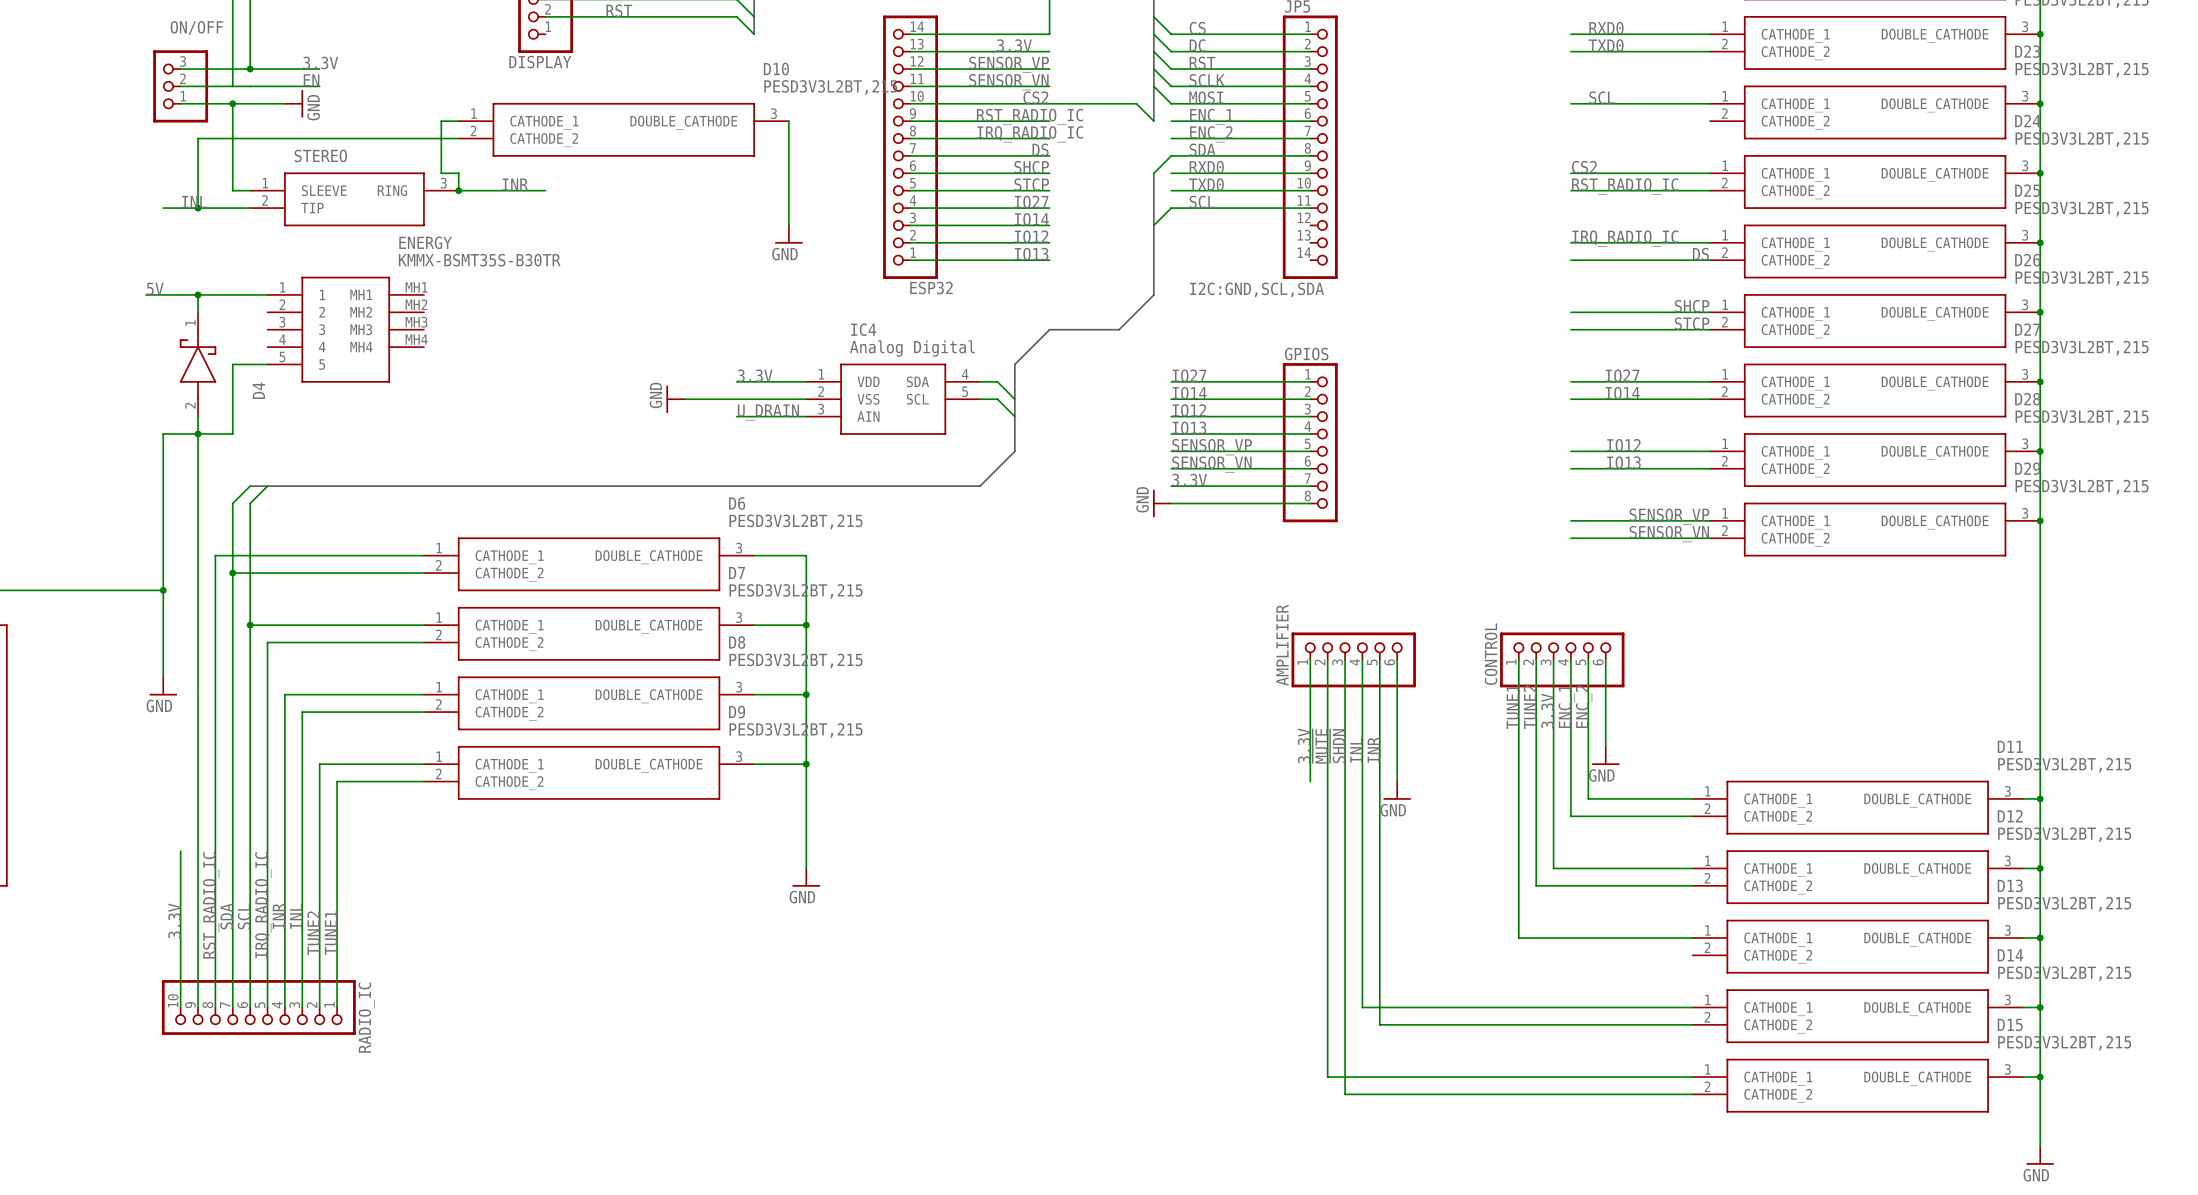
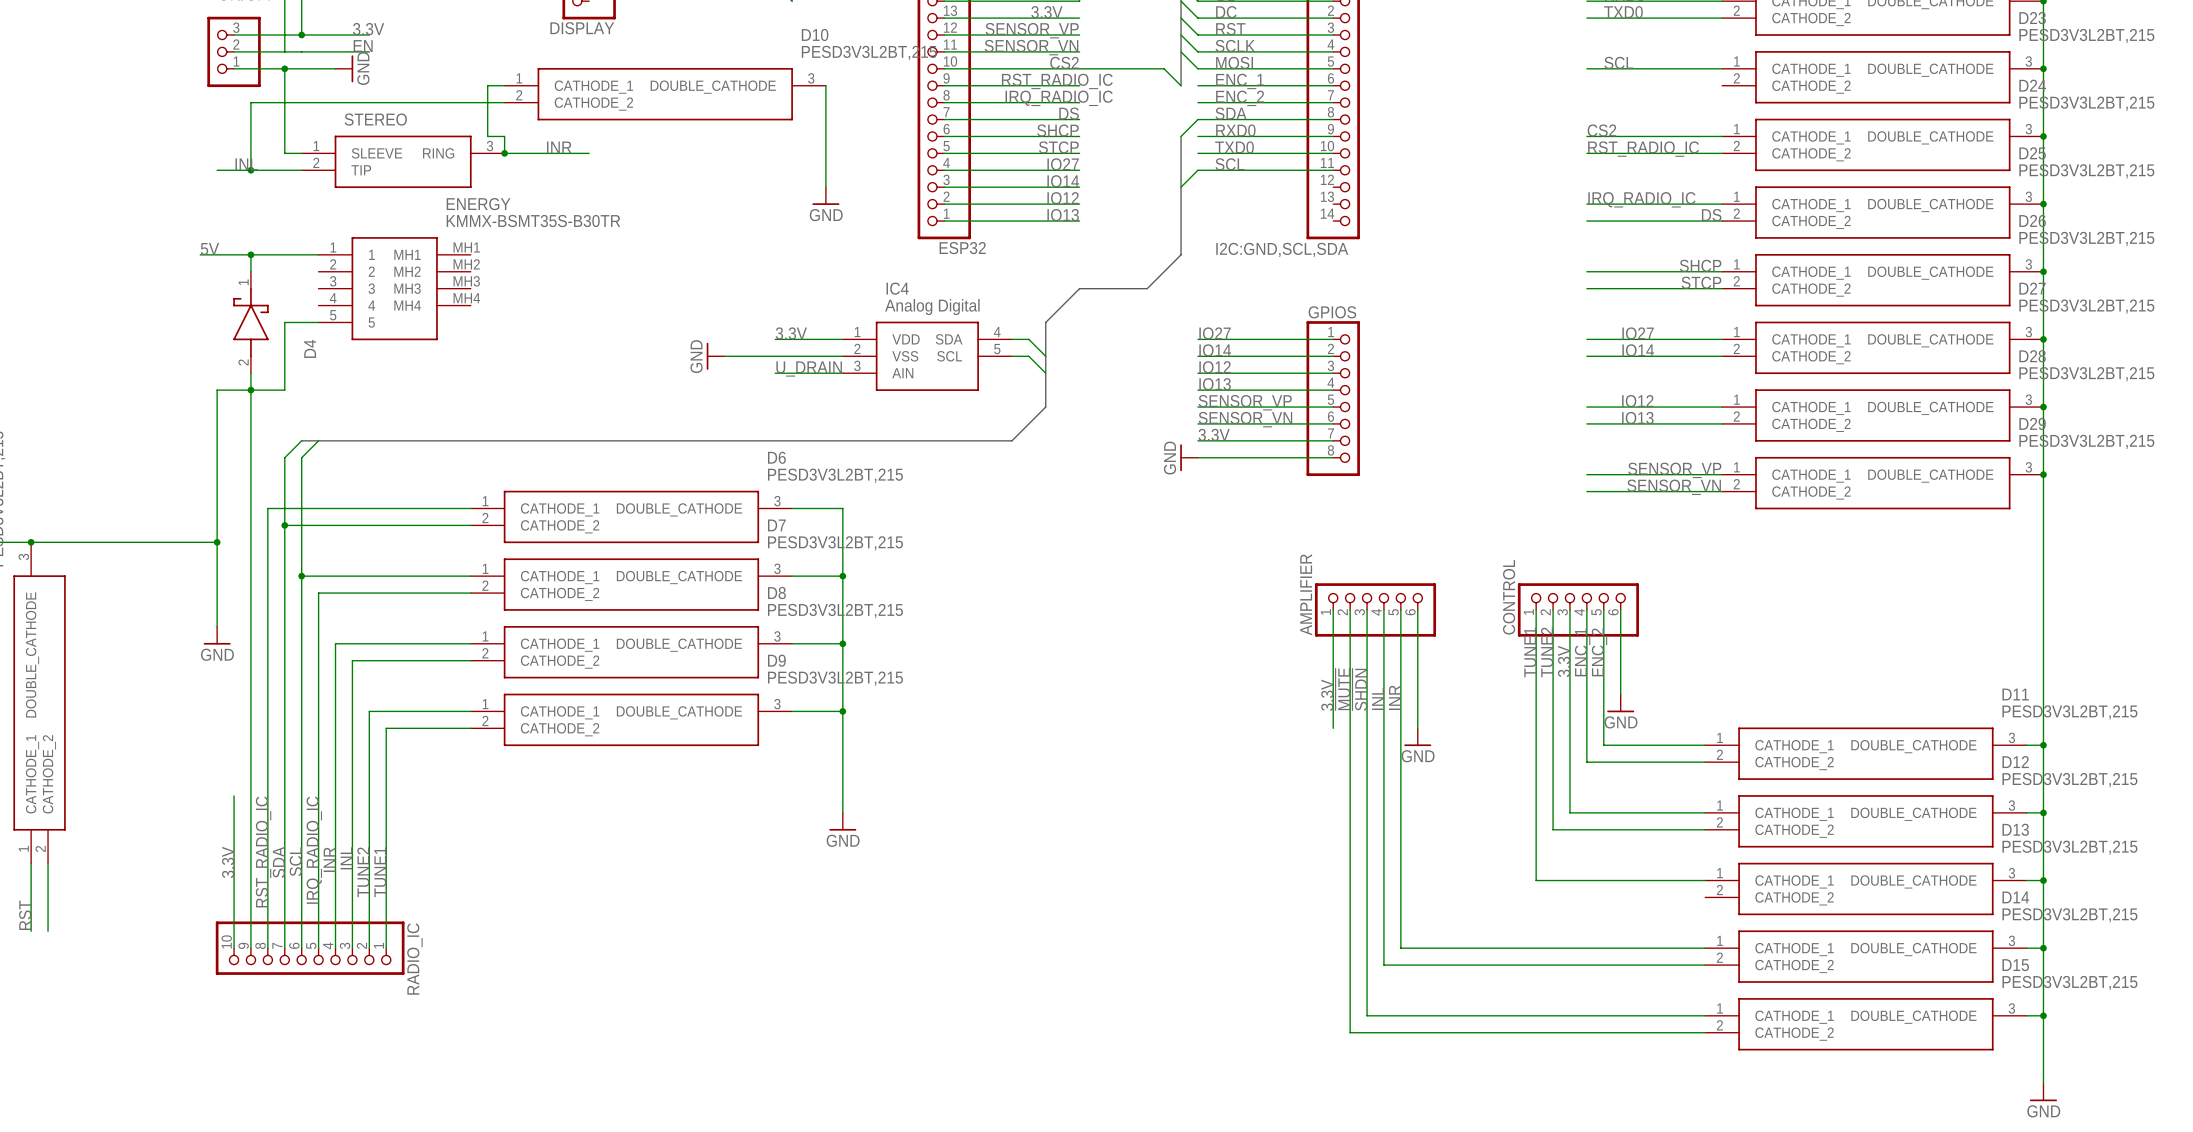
wire: (1362, 1007) (1379, 1007) (1379, 1024) -> (1383, 948) (1383, 965) (1400, 965)
wire: (1327, 1077) (1345, 1077) (1345, 1094) -> (1350, 1015) (1350, 1032) (1367, 1032)

